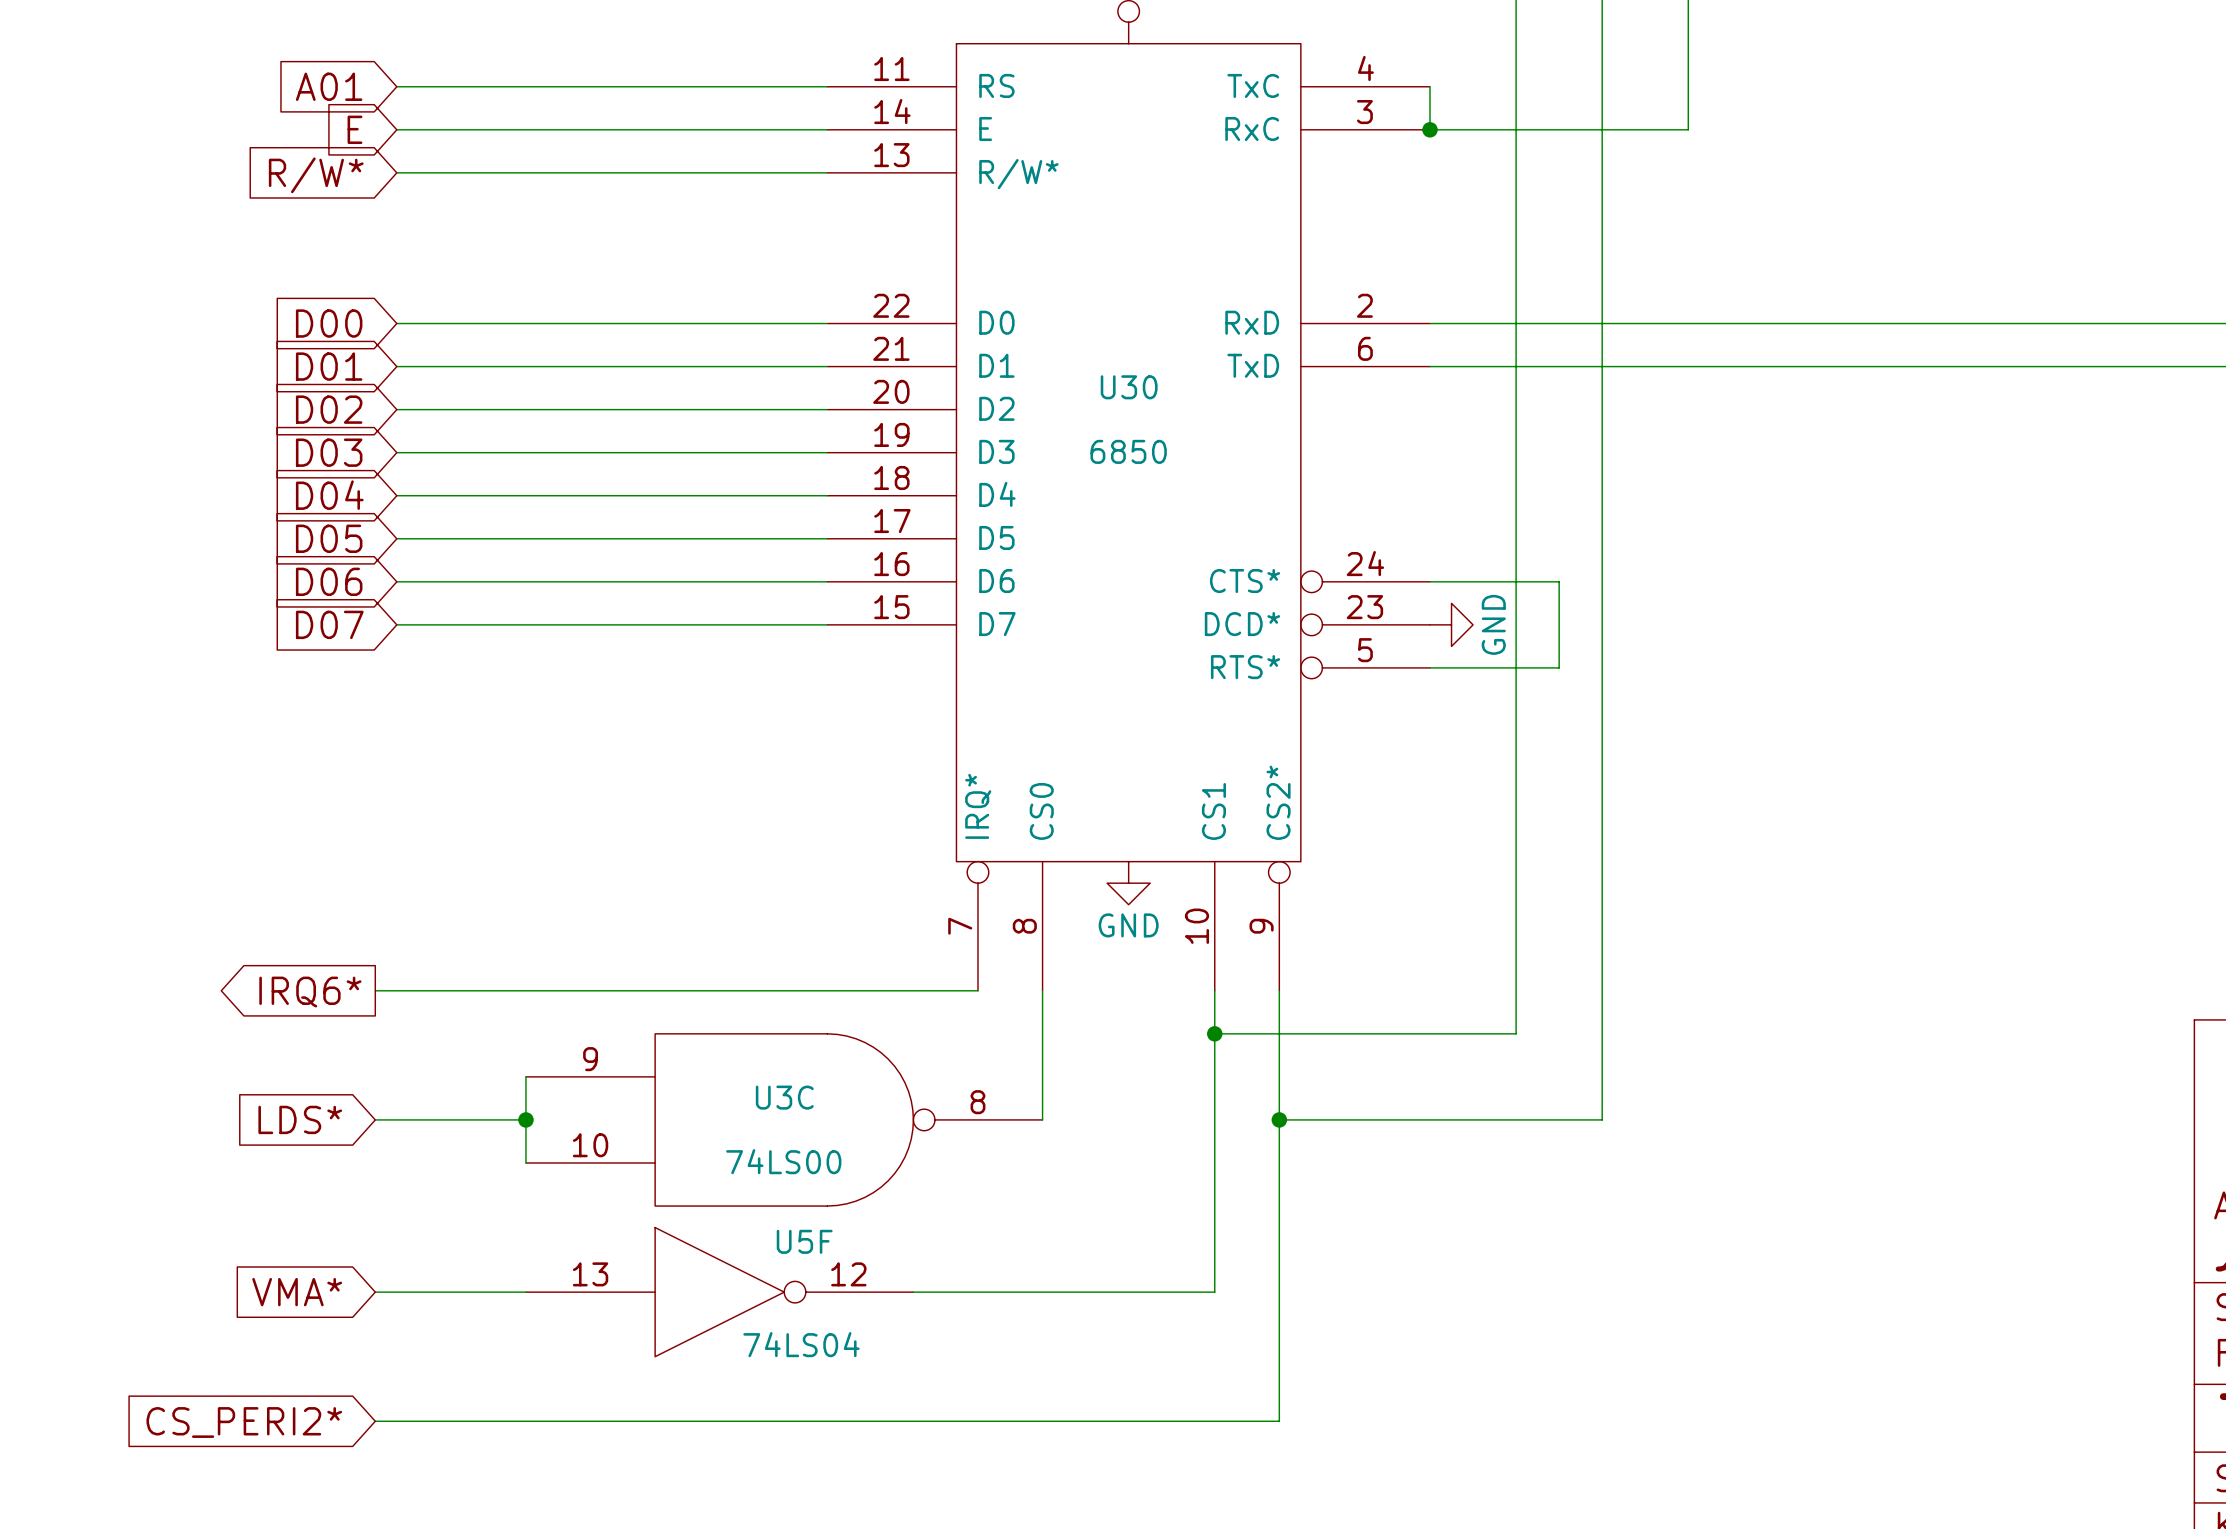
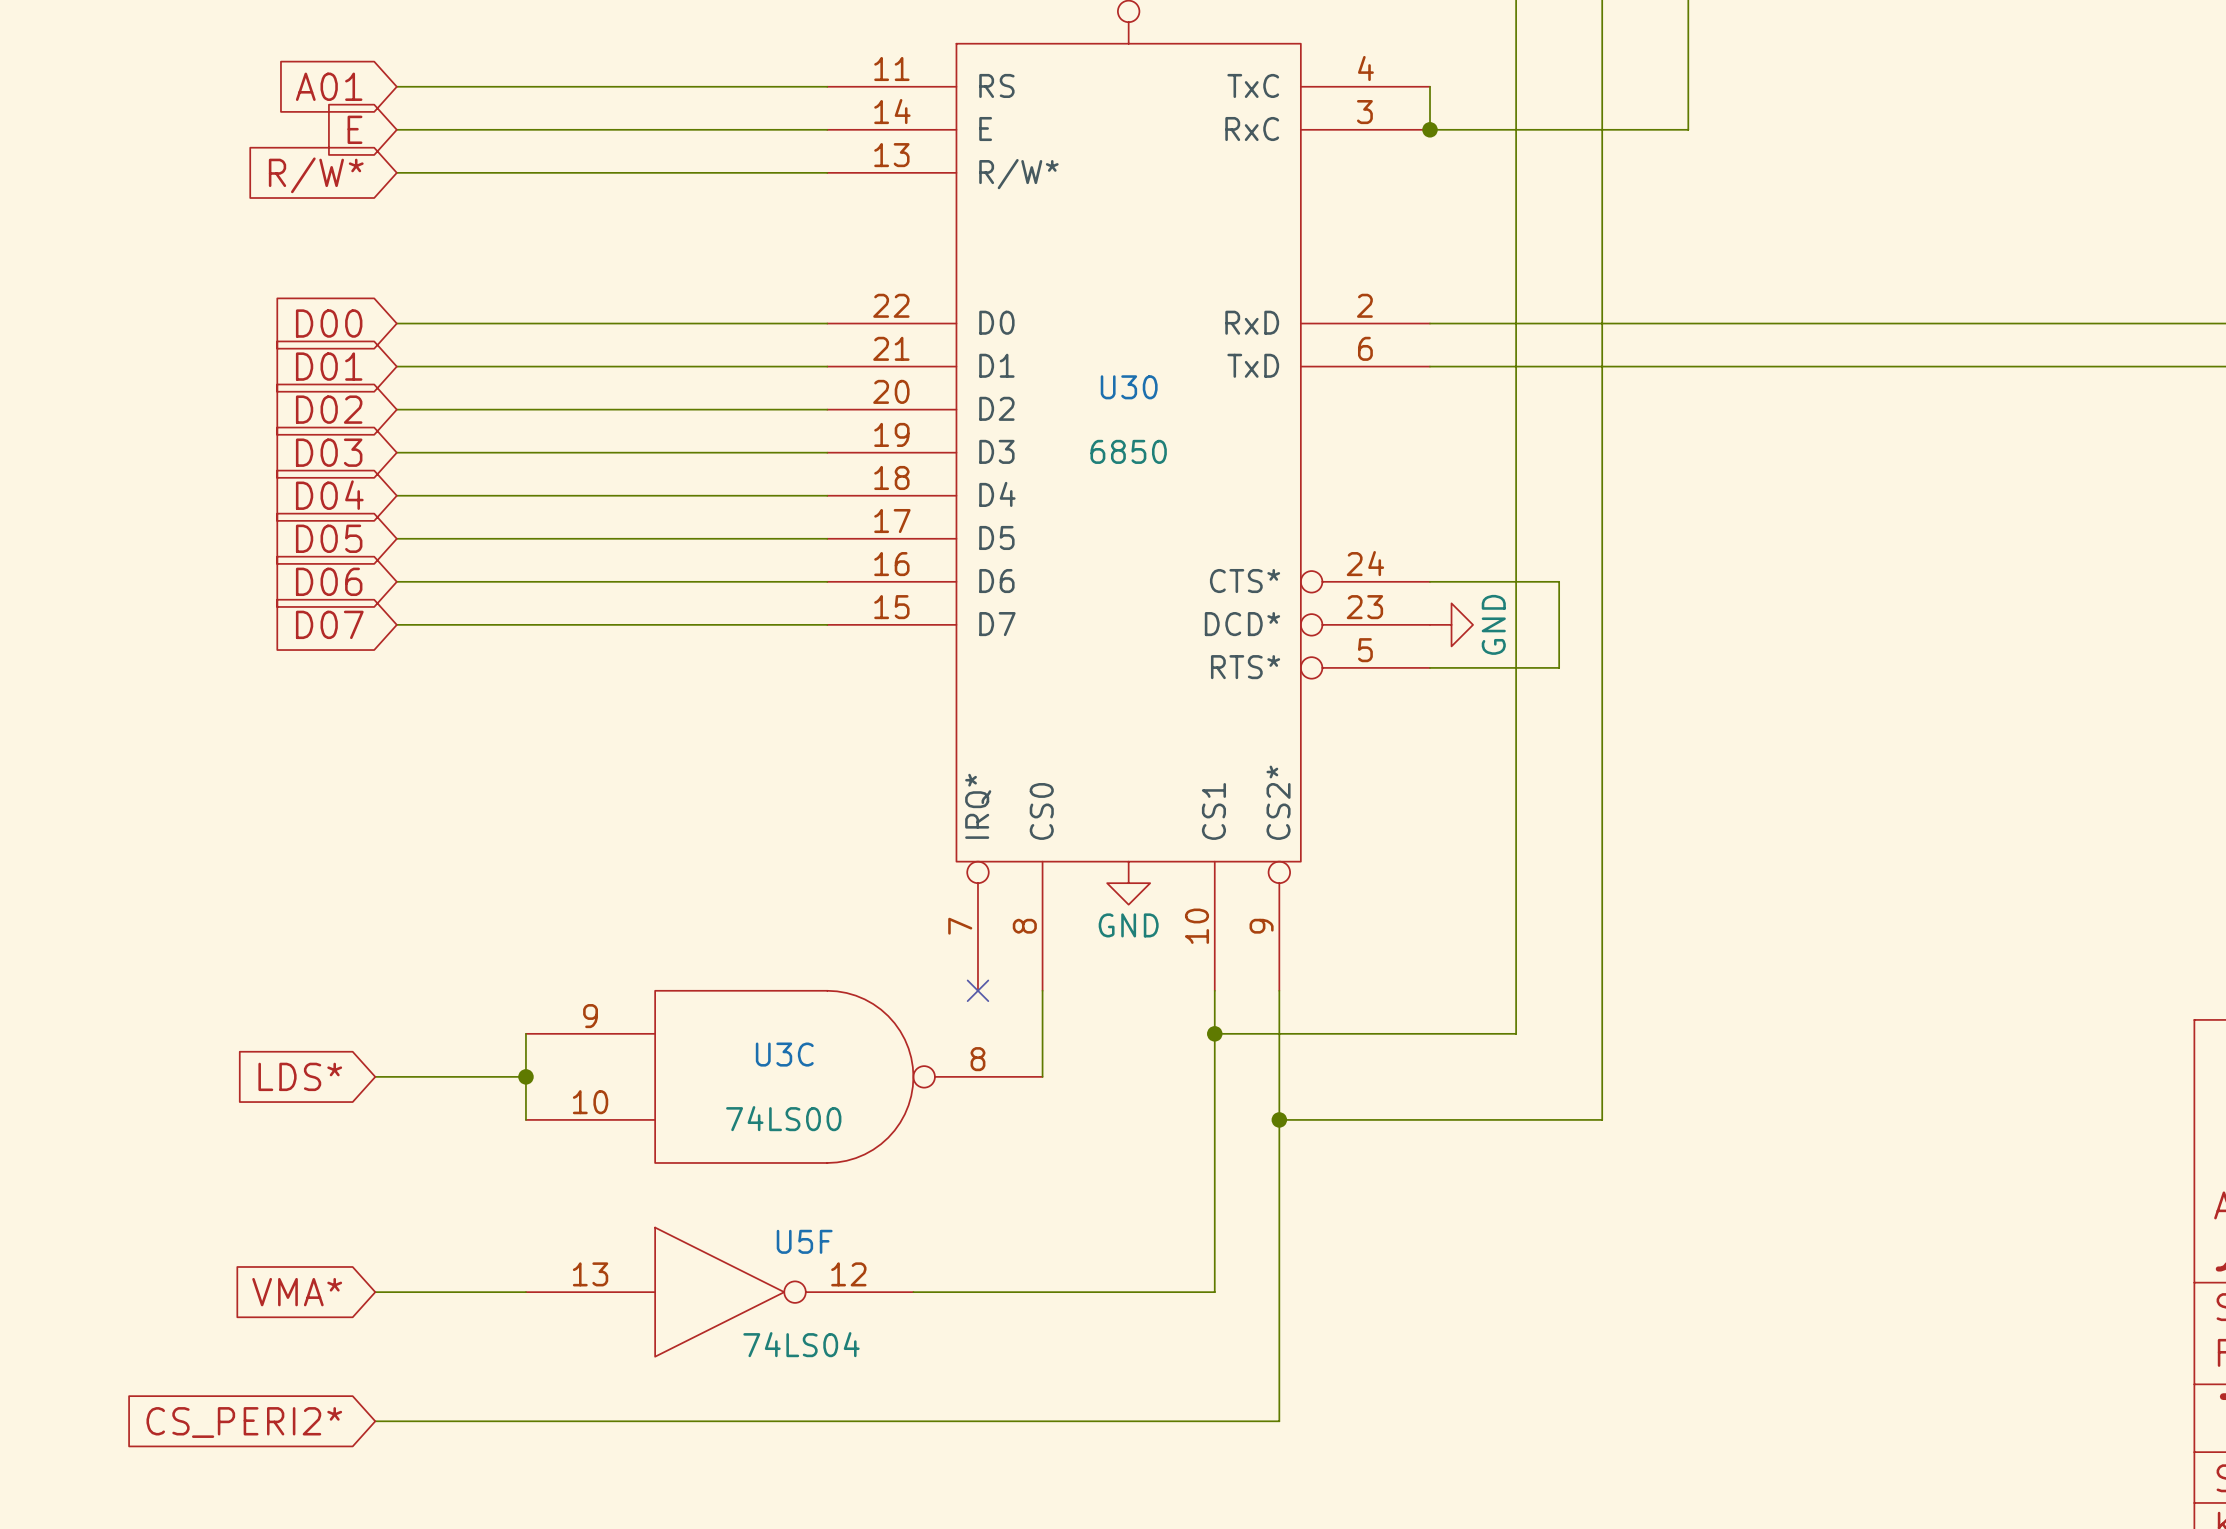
wire: (375, 990) (977, 990) -> none
no-connect mark: none -> (977, 990)
global label: IRQ6* (310, 992) -> none
wire: none -> (525, 1033) (525, 1076) (375, 1076)
wire: (1042, 1076) (1042, 1119) -> none
global label position: LDS* (300, 1119) -> LDS* (300, 1076)
wire: (375, 1119) (525, 1119) (525, 1162) -> none
junction position: (525, 1119) -> (525, 1076)
U3C position: (784, 1119) -> (784, 1076)

